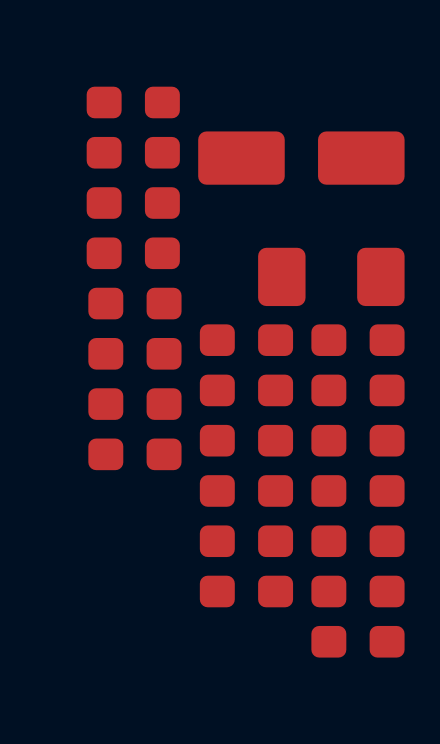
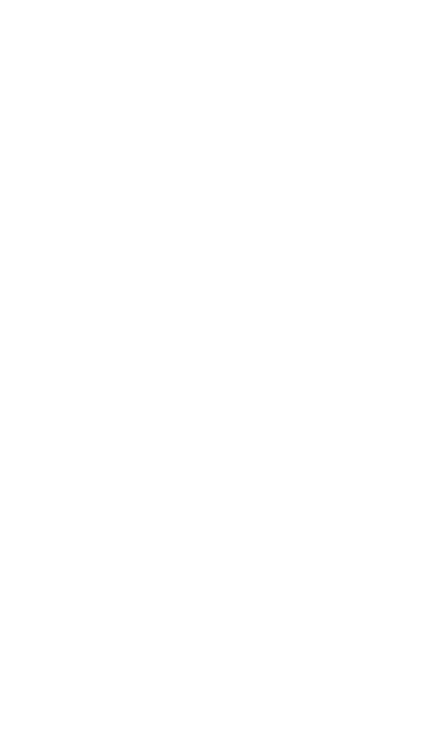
part: (133, 102) -> none
part: (133, 152) -> none
part: (301, 158) -> none
part: (133, 203) -> none
part: (133, 253) -> none
part: (331, 276) -> none
part: (134, 303) -> none
part: (246, 340) -> none
part: (357, 340) -> none
part: (134, 353) -> none
part: (246, 390) -> none
part: (357, 390) -> none
part: (134, 404) -> none
part: (246, 440) -> none
part: (357, 440) -> none
part: (134, 454) -> none
part: (246, 490) -> none
part: (357, 490) -> none
part: (246, 541) -> none
part: (357, 541) -> none
part: (246, 591) -> none
part: (357, 591) -> none
part: (357, 641) -> none

